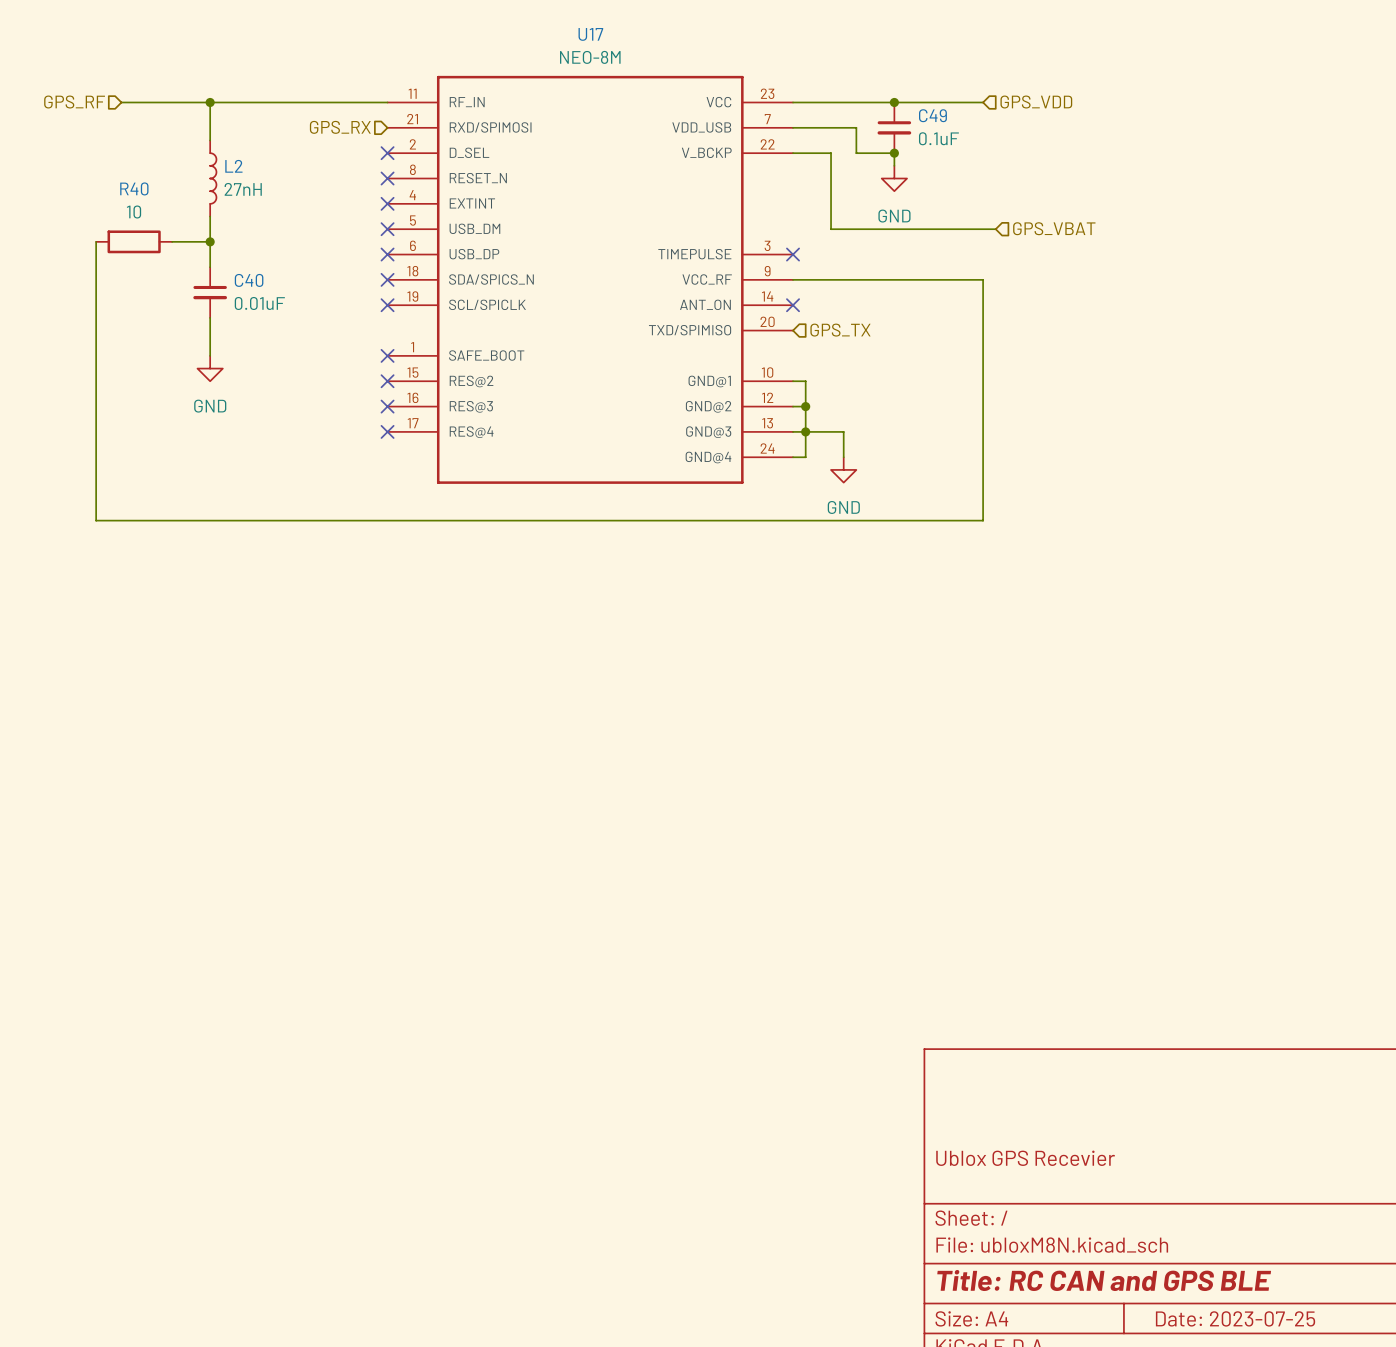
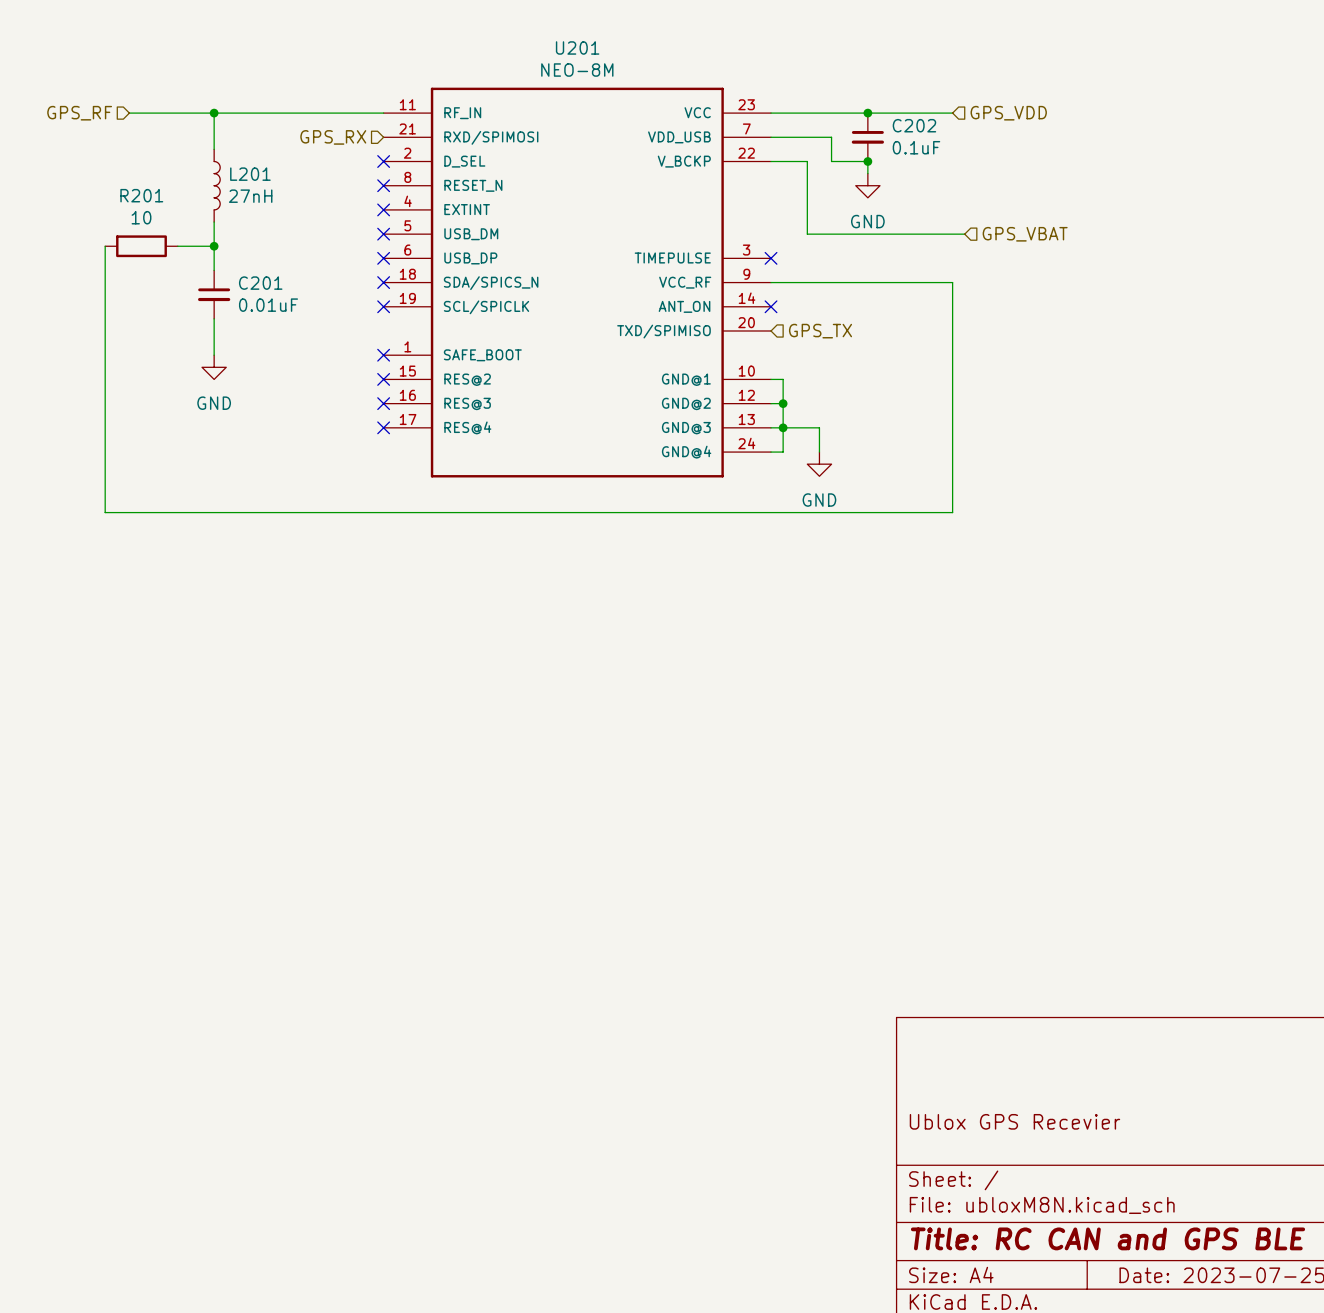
U17 name: U17 (590, 34) -> U201 (577, 47)
C49 name: C49 (932, 115) -> C202 (914, 125)
L2 name: L2 (233, 166) -> L201 (250, 174)
R40 name: R40 (134, 188) -> R201 (141, 195)
C40 name: C40 (249, 280) -> C201 (260, 283)

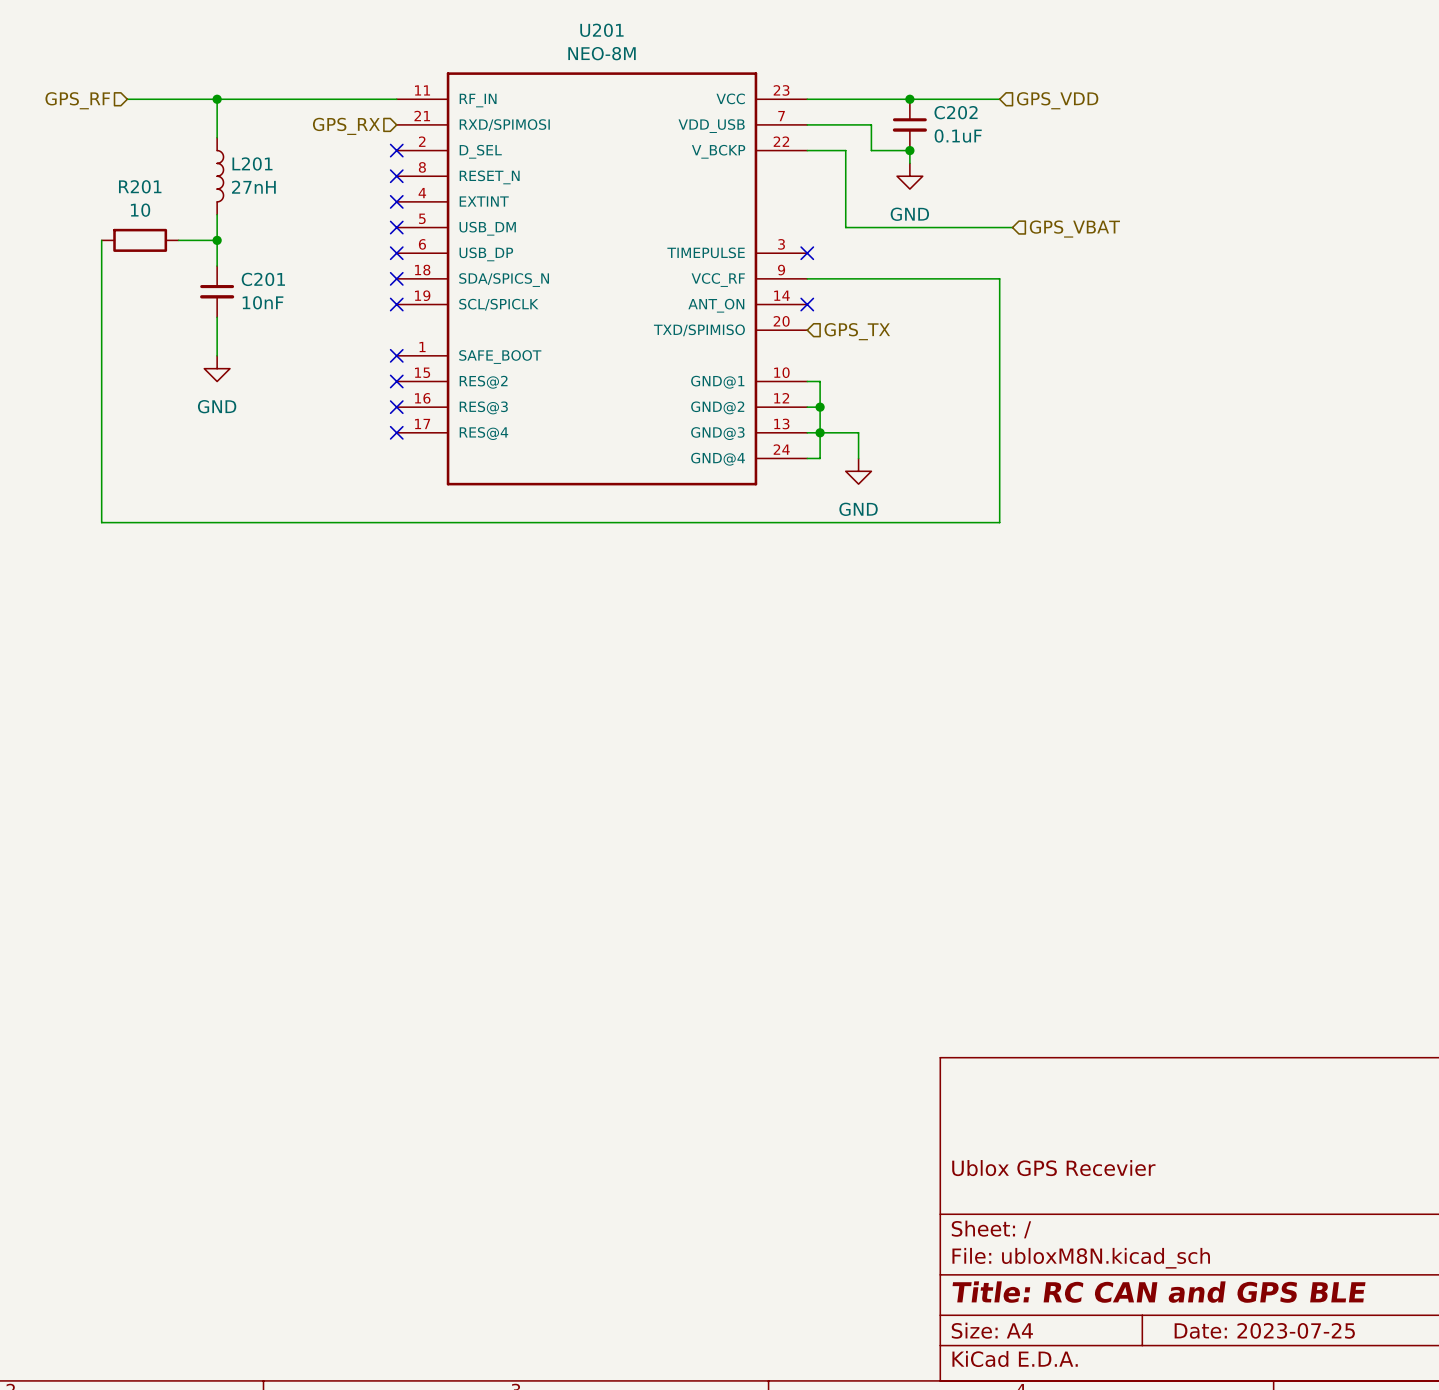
C201 value: 0.01uF (268, 305) -> 10nF (263, 302)

